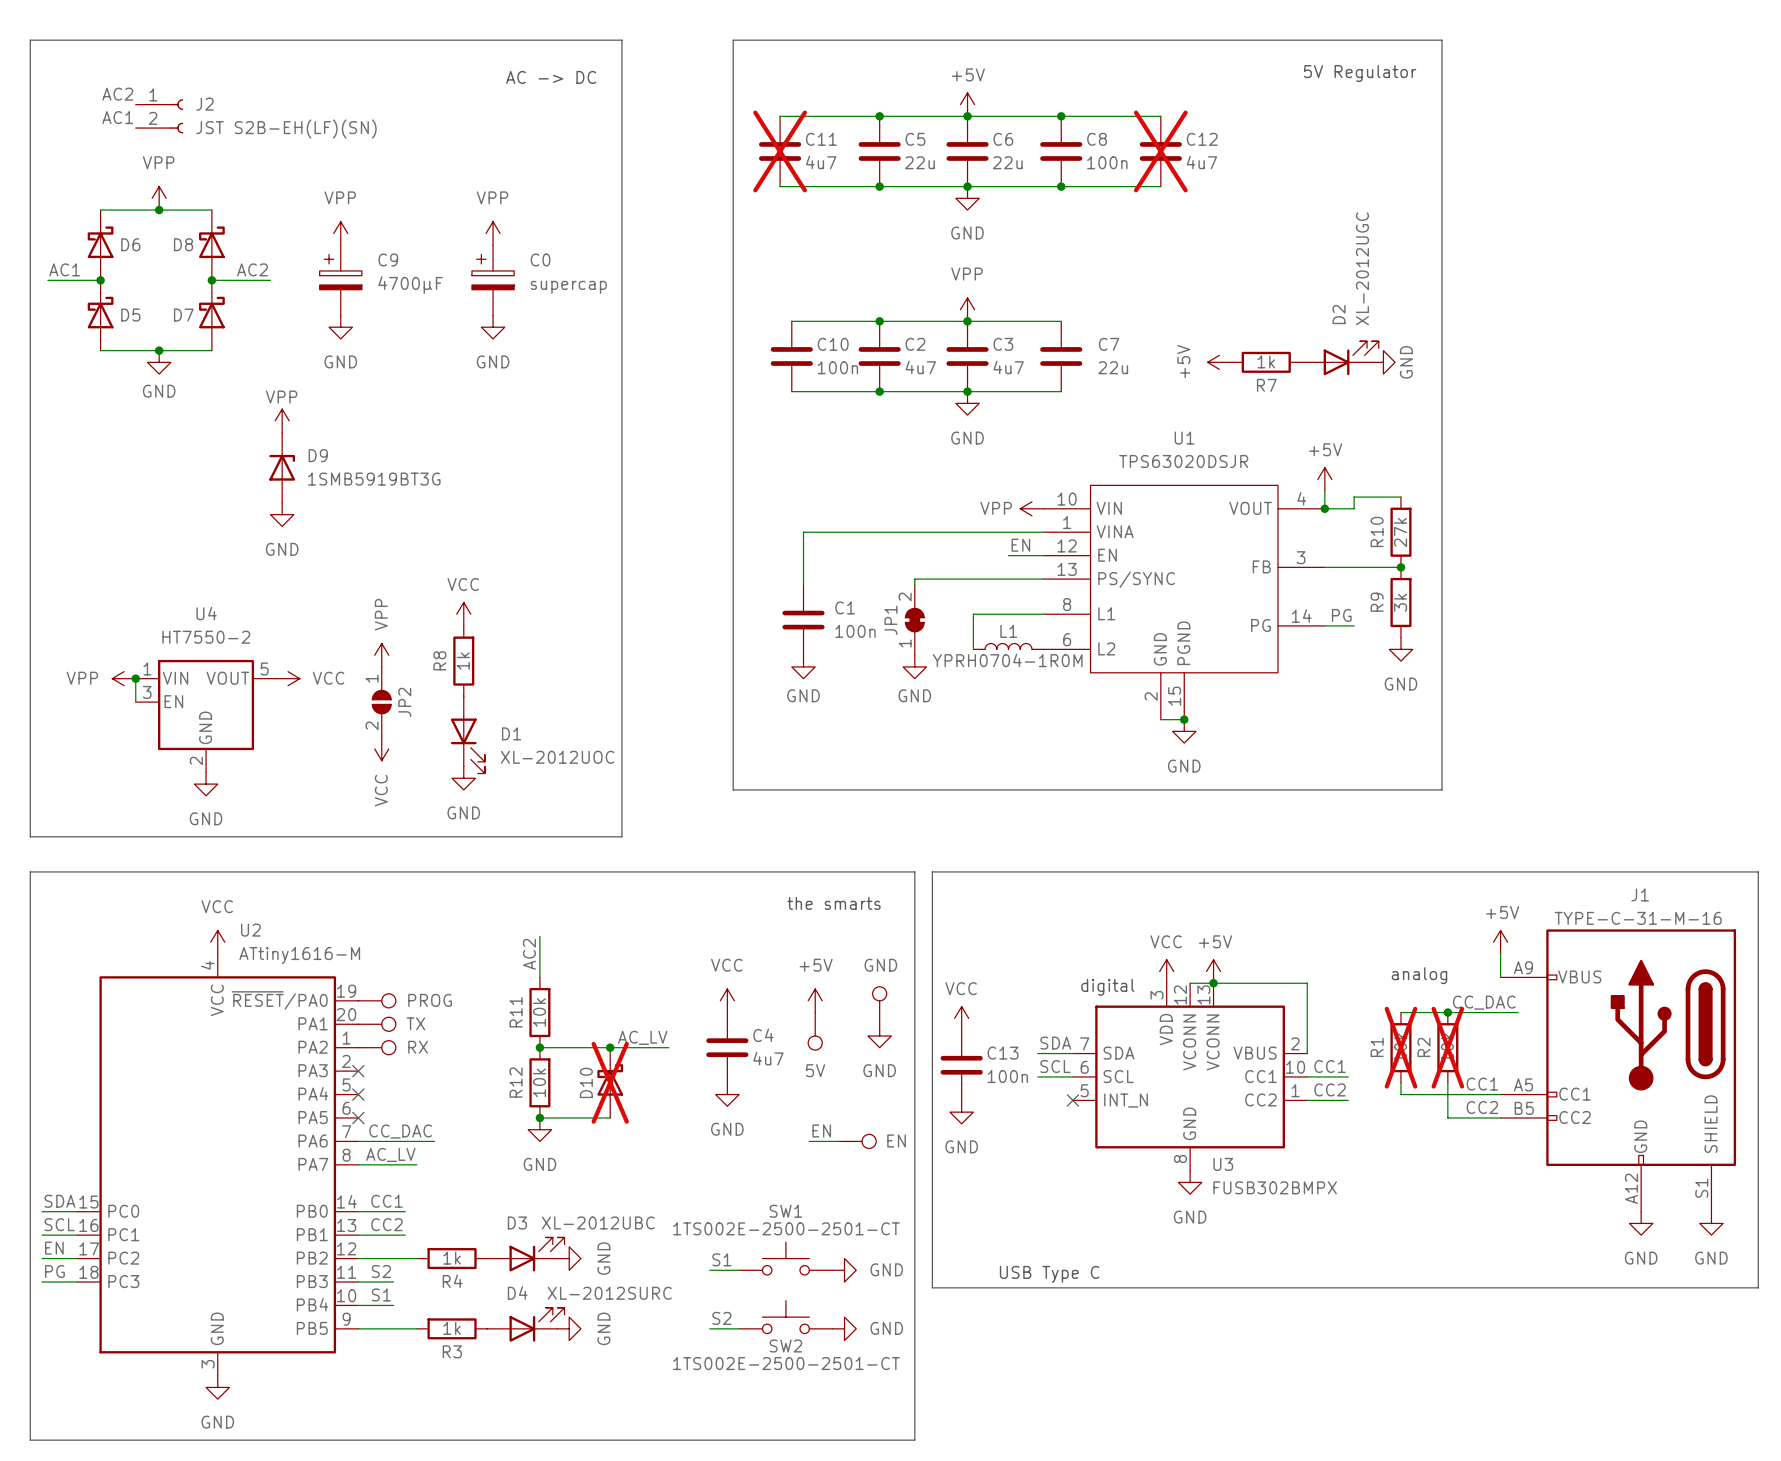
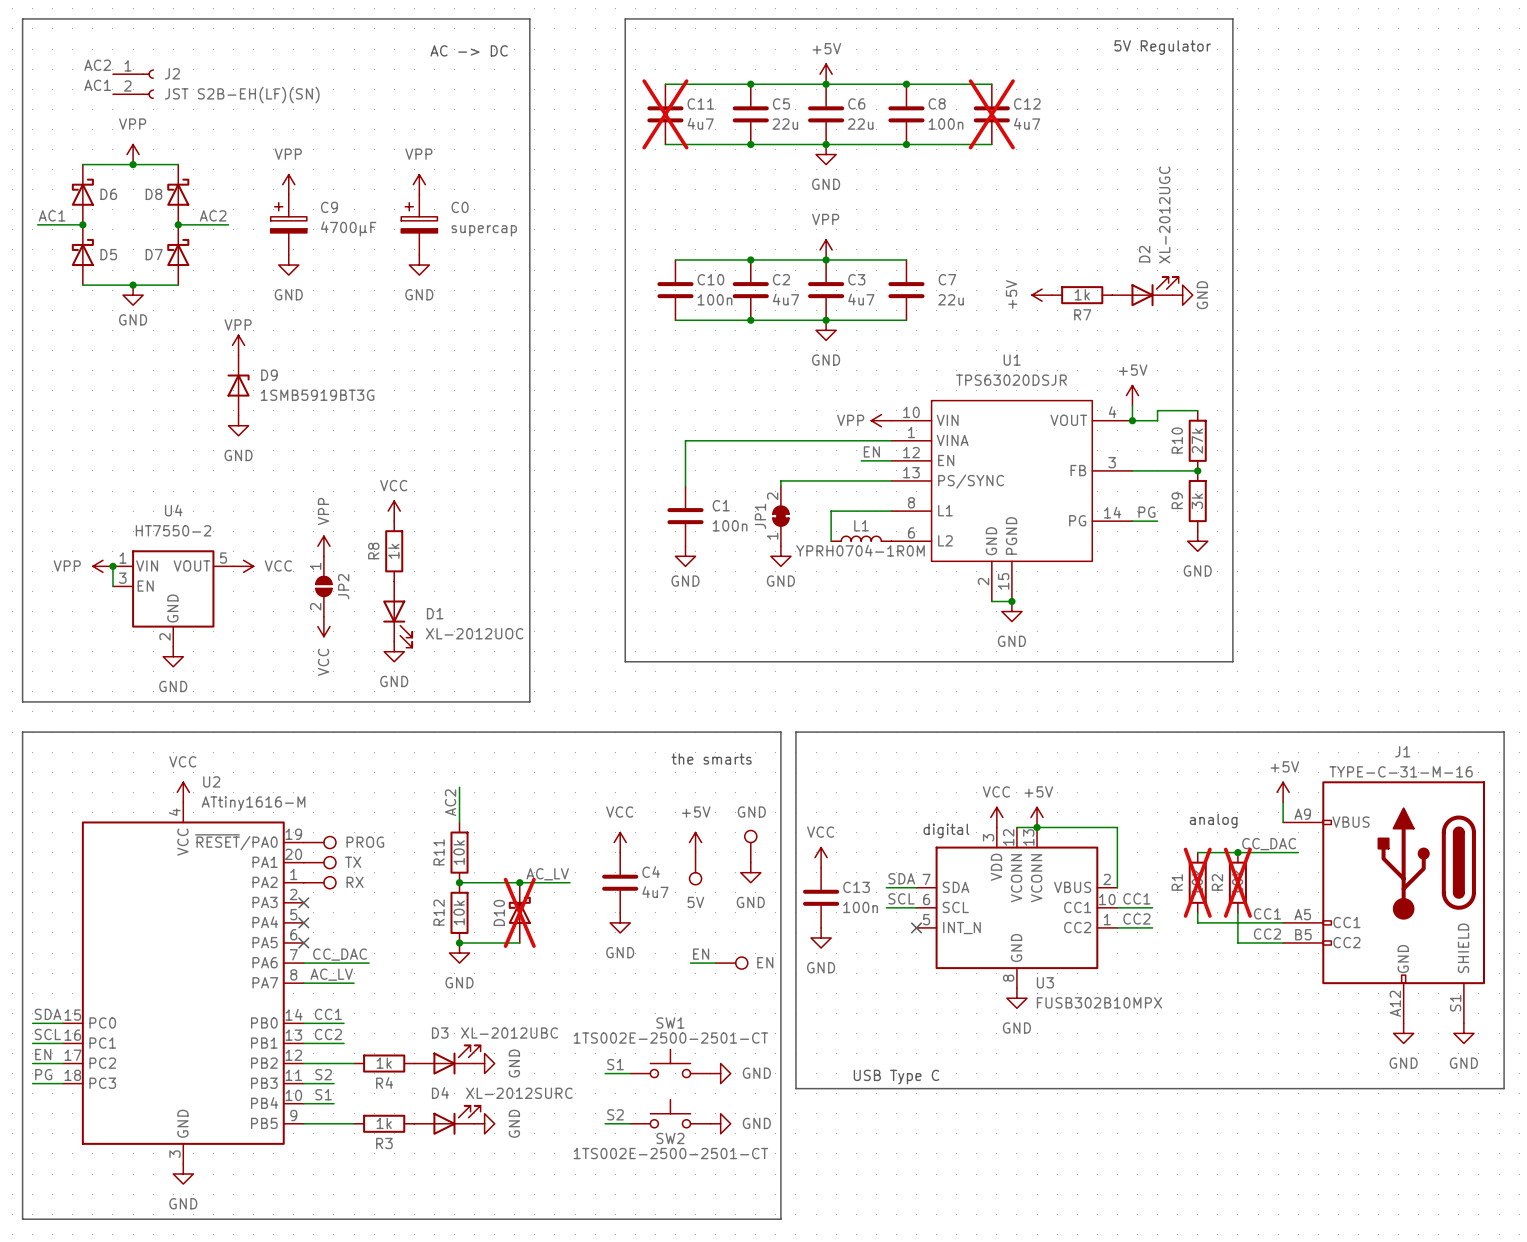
U3 value: FUSB302BMPX (1275, 1187) -> FUSB302B10MPX (1099, 1002)

